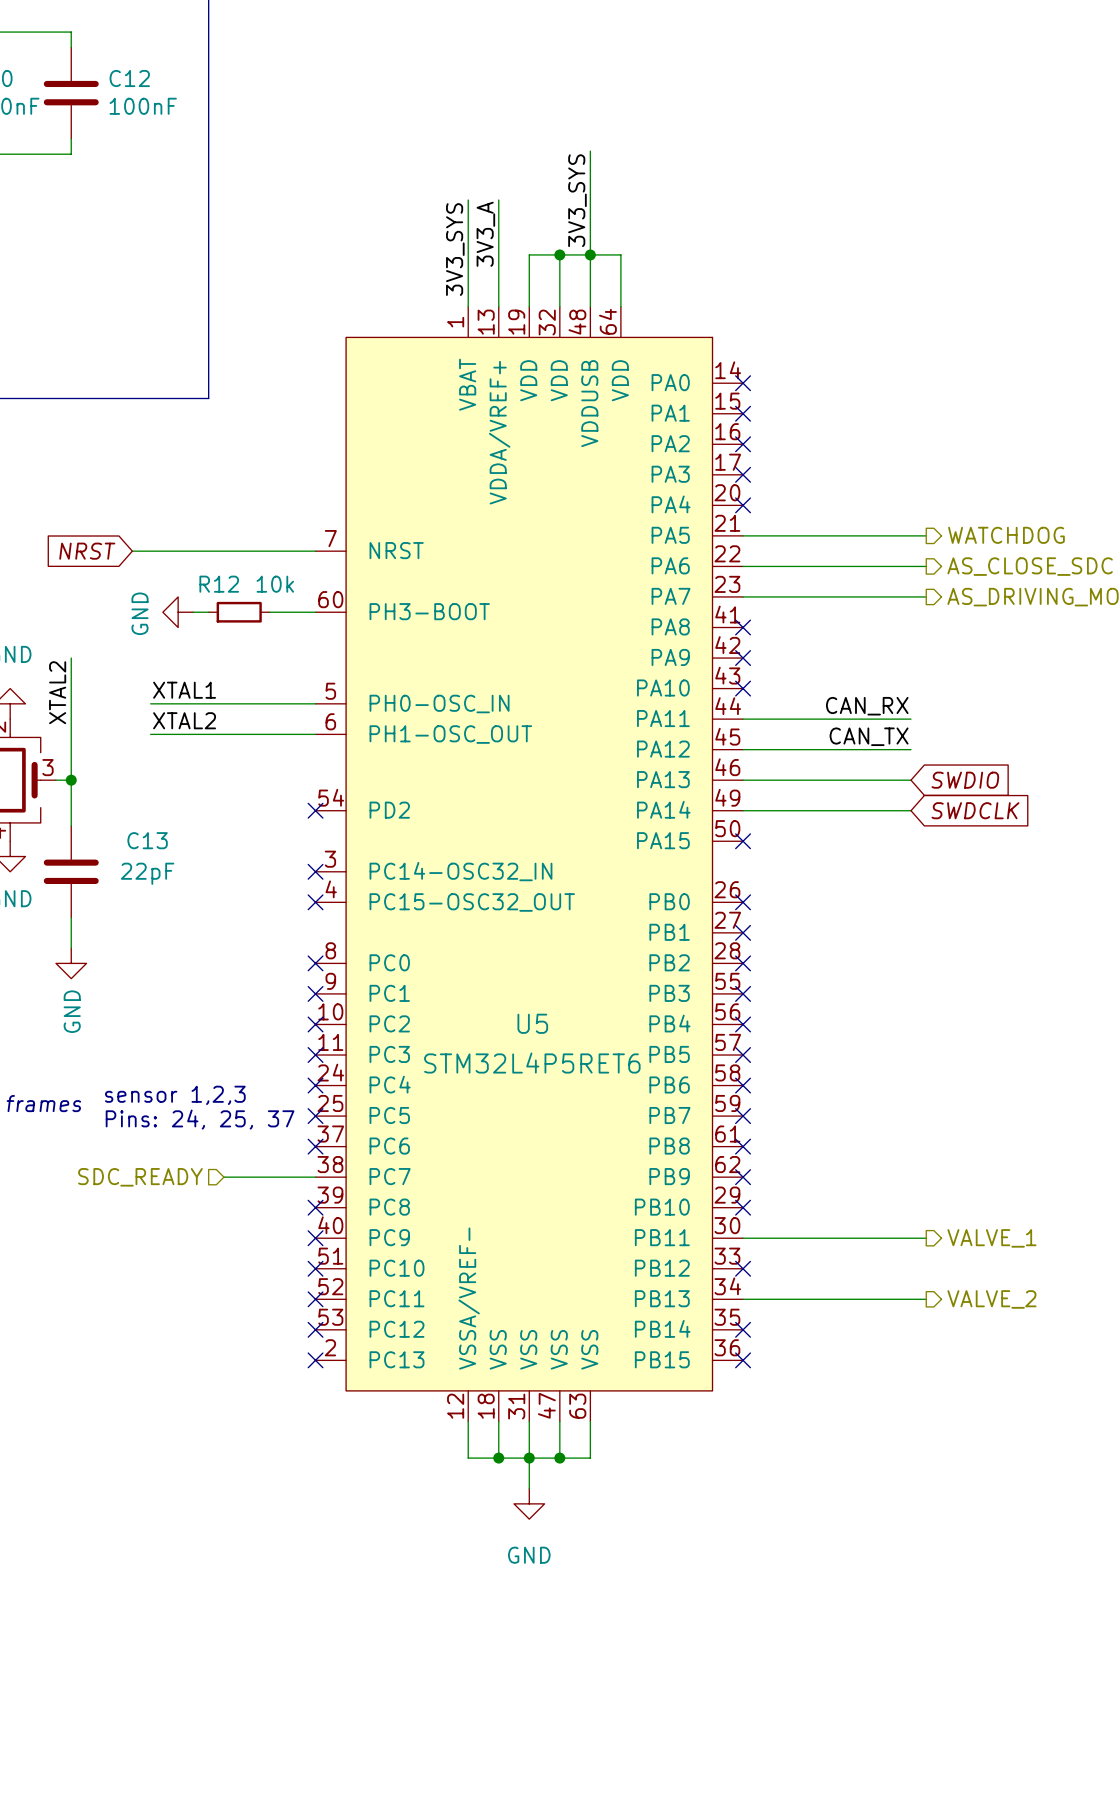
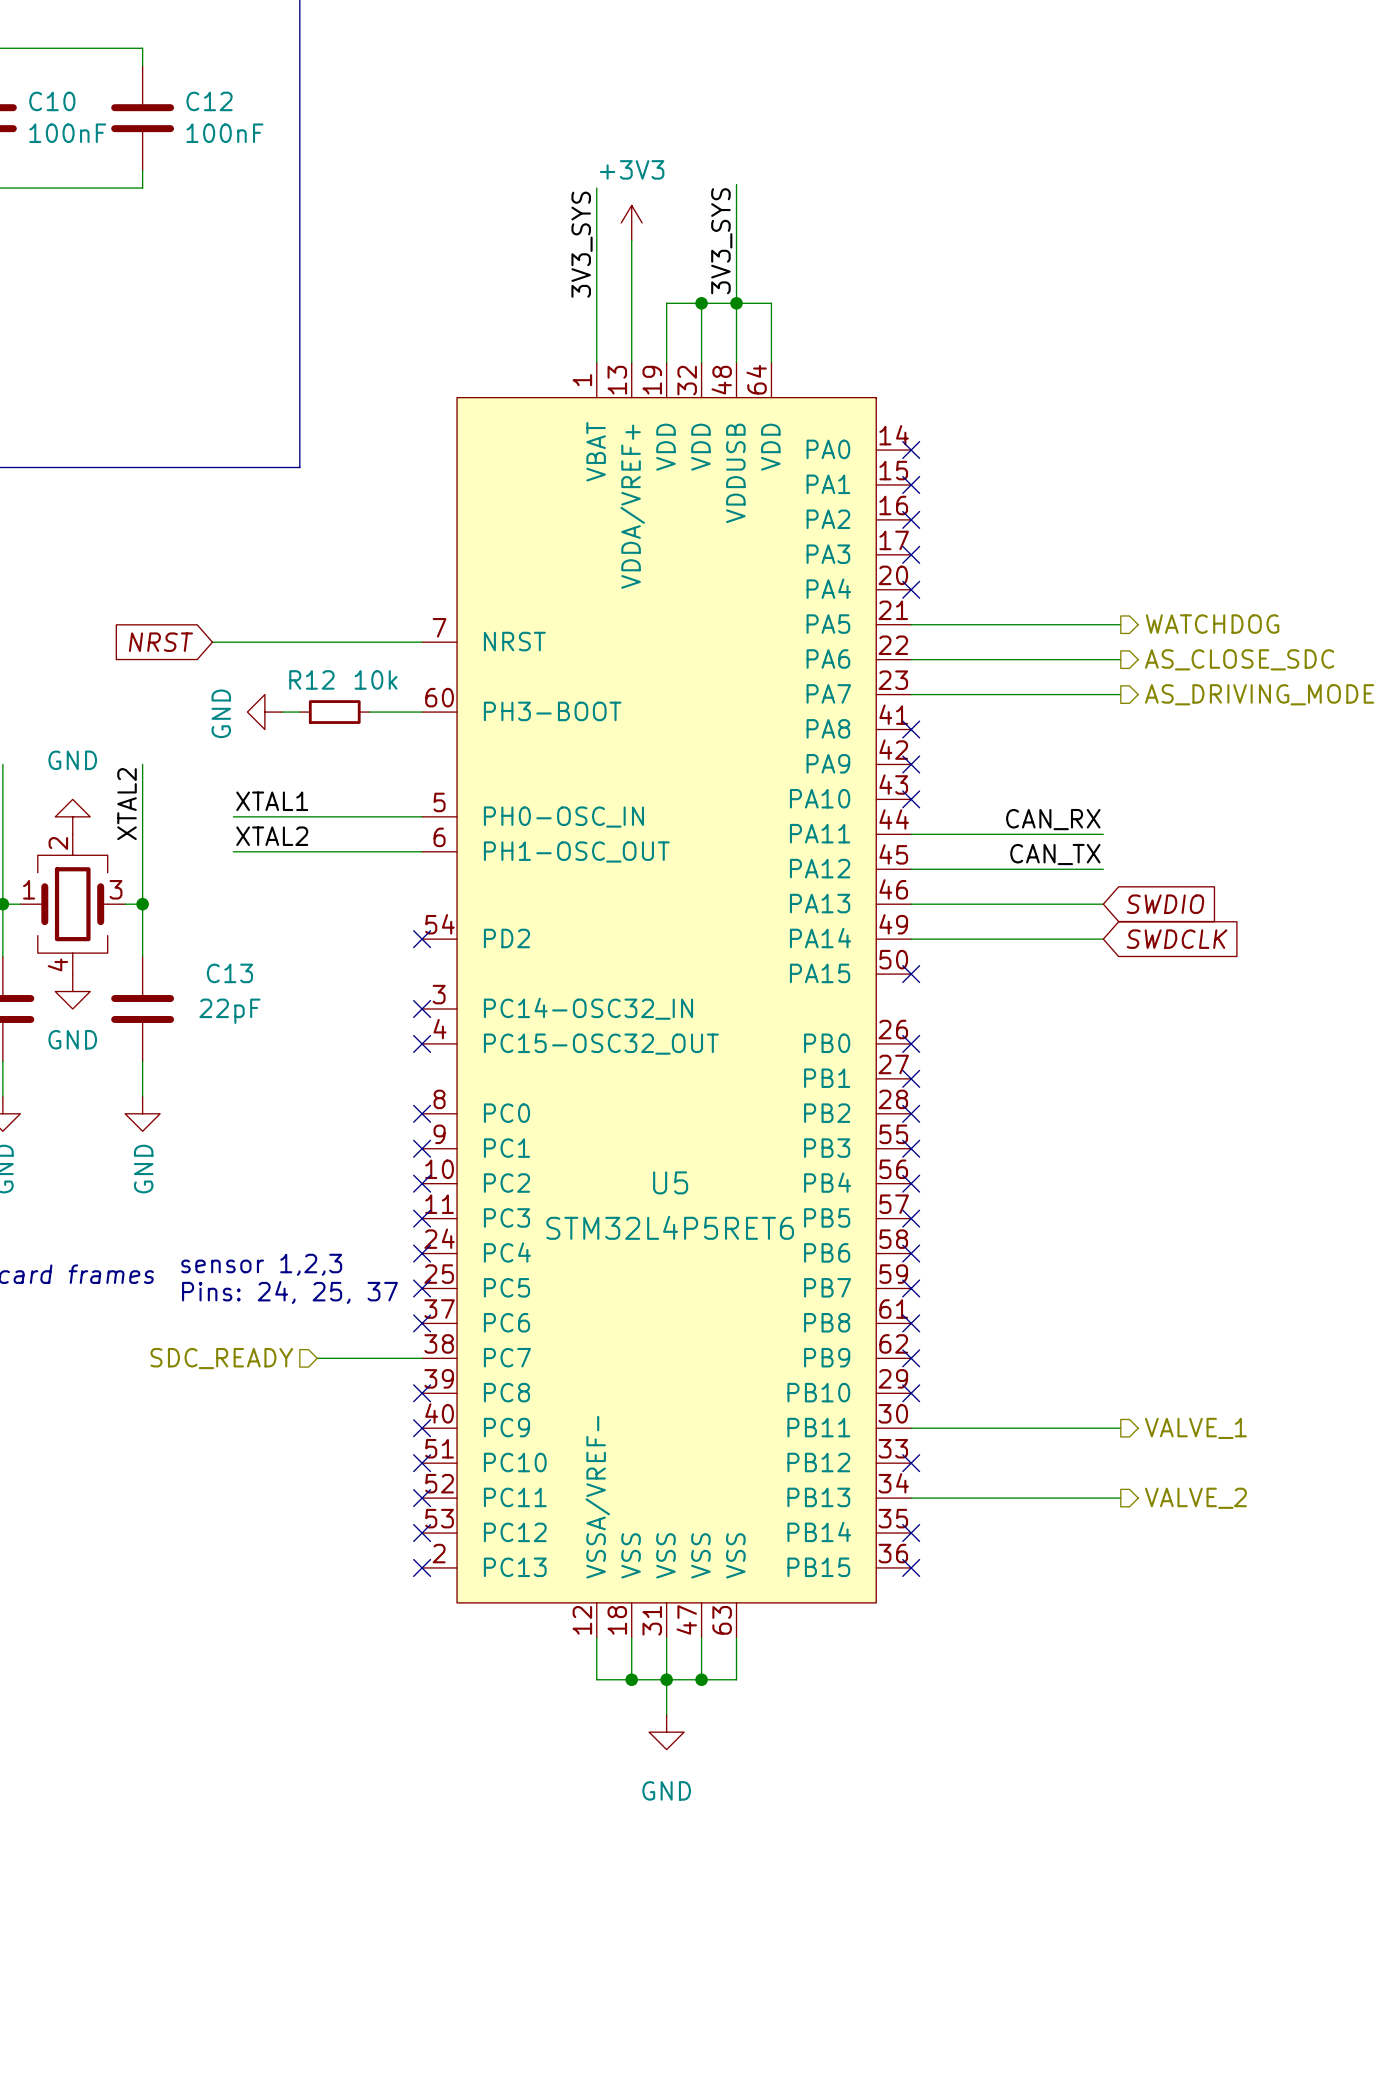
wire: none -> (596, 188) (596, 240)
power symbol: none -> +3V3 (631, 222)
label: 3V3_A (485, 234) -> none
label position: 3V3_SYS (455, 249) -> 3V3_SYS (582, 244)

